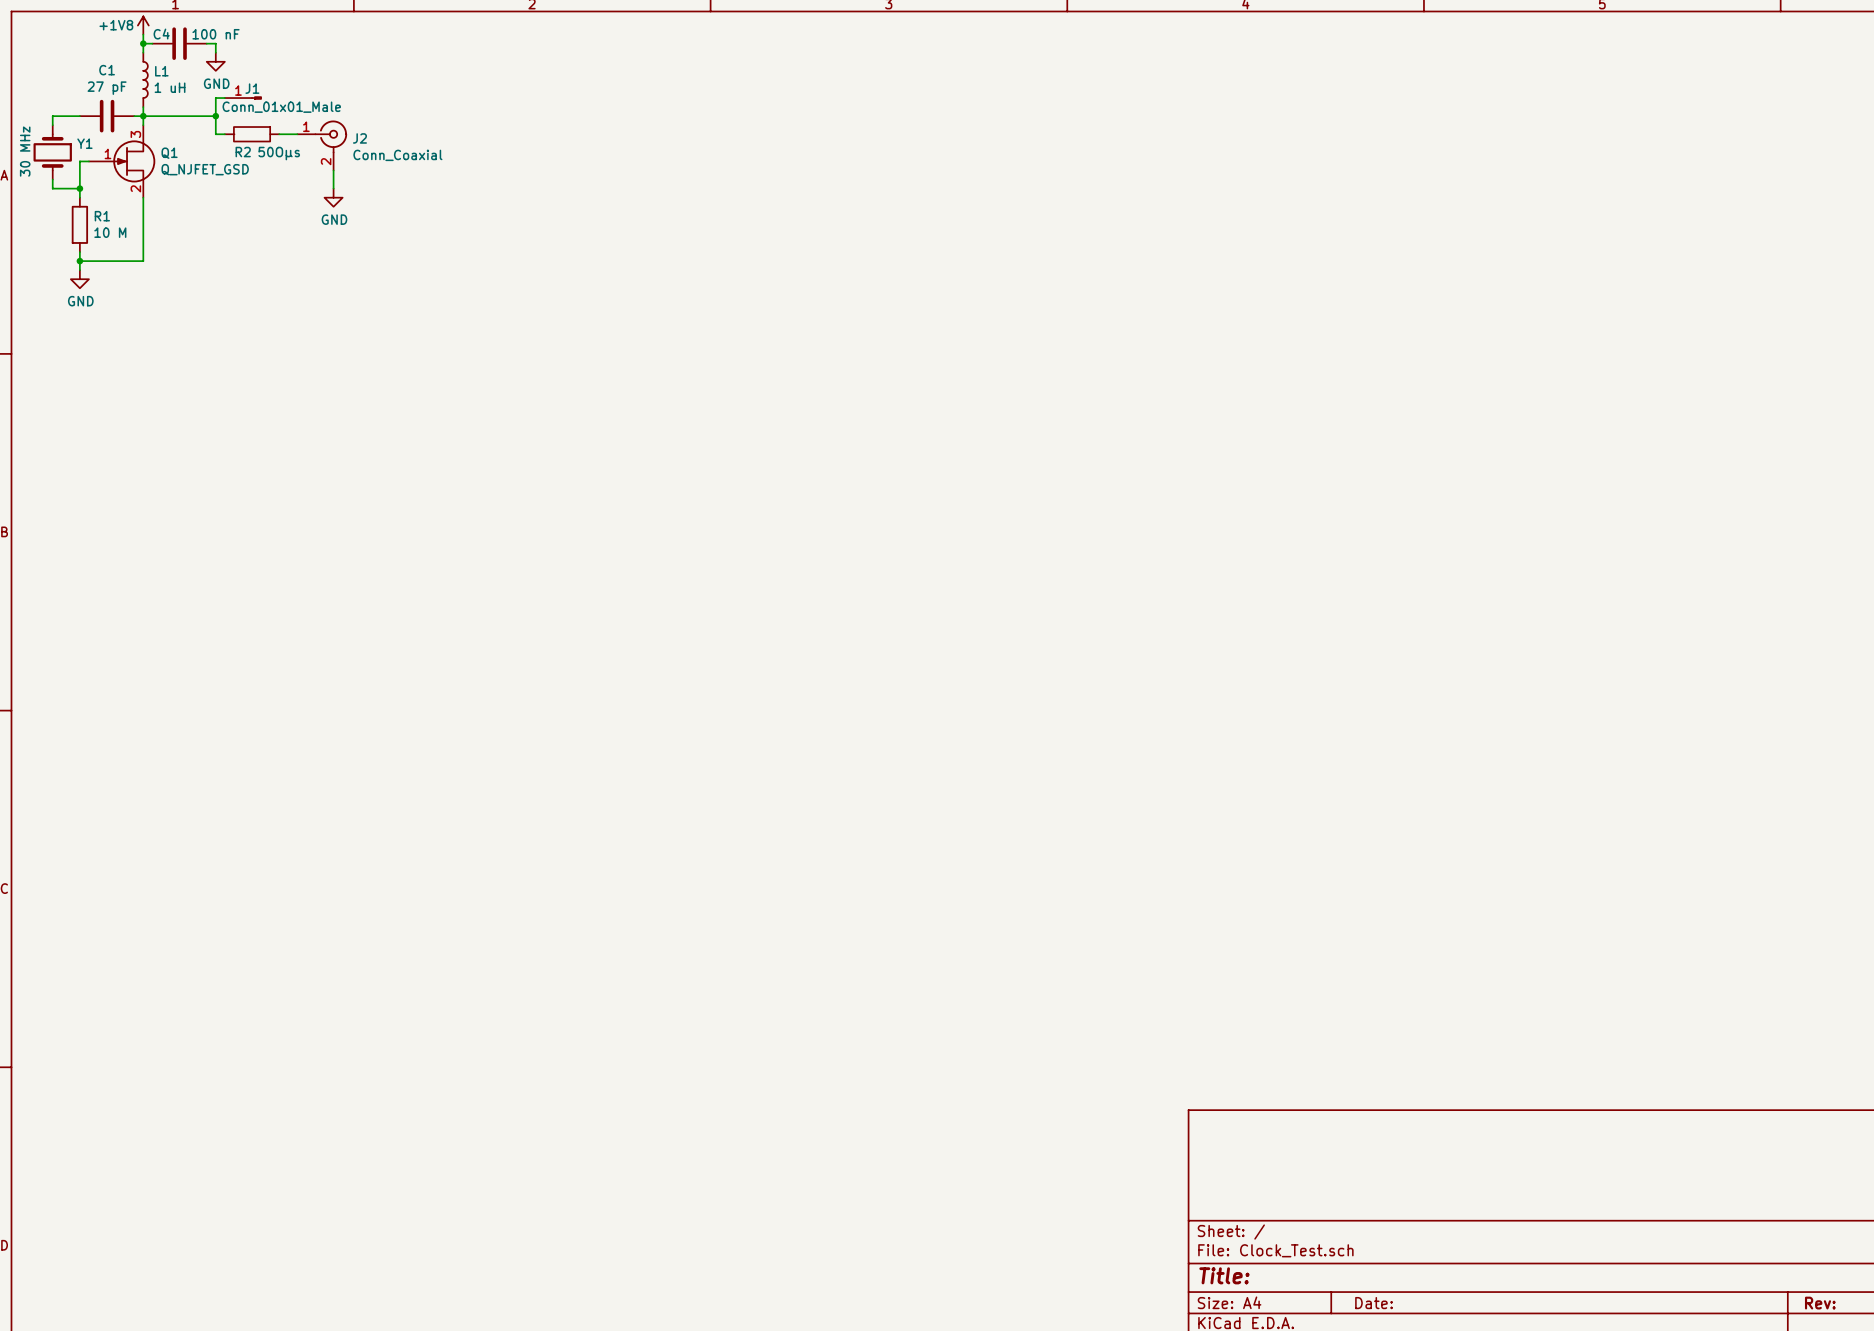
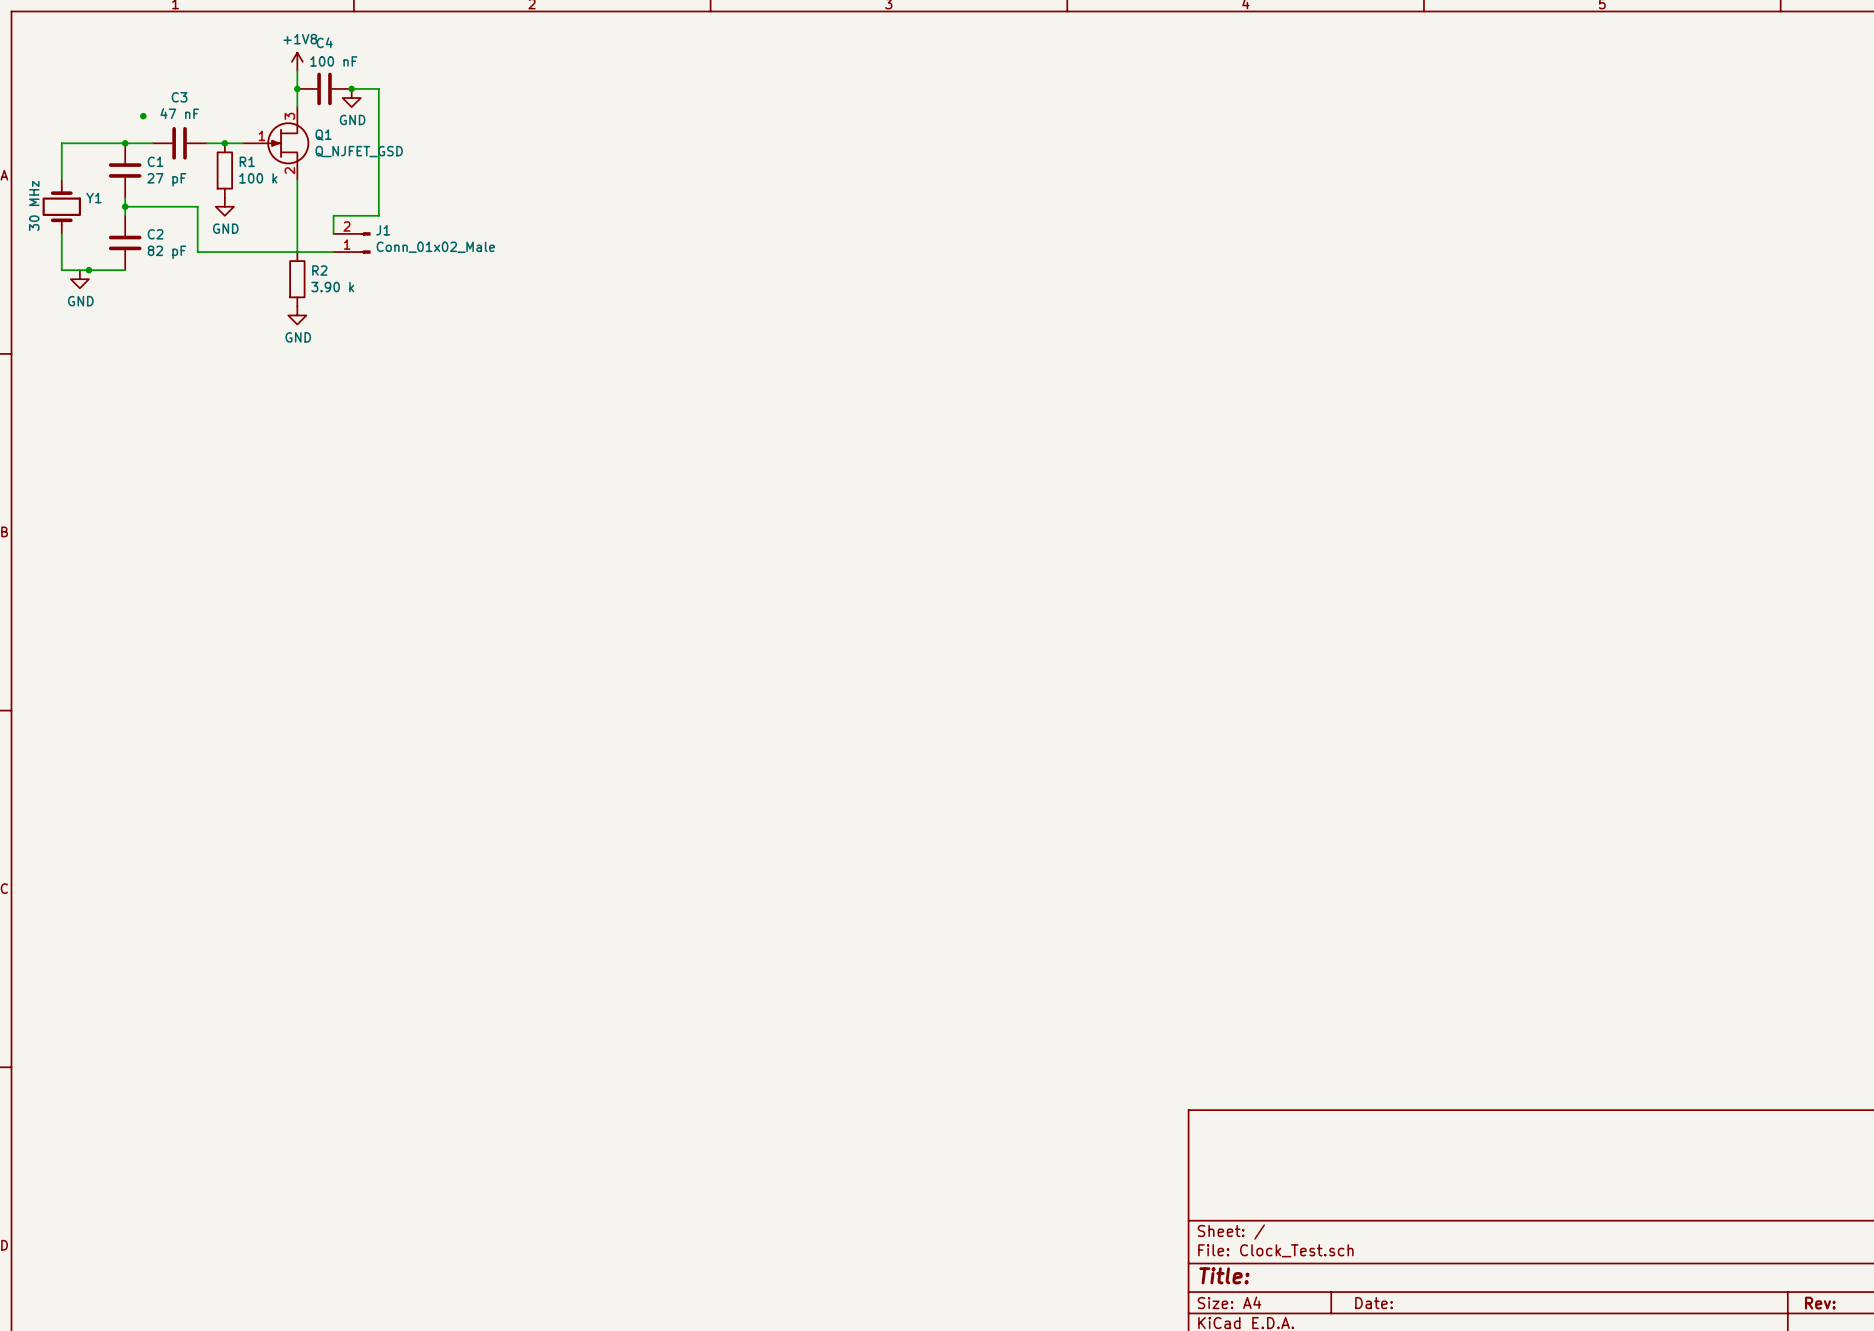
power symbol text position: +1V8 (116, 25) -> +1V8 (300, 39)
power symbol position: +1V8 (143, 25) -> +1V8 (297, 61)
wire: (143, 34) (143, 52) -> none
C4 name position: C4 (161, 34) -> C4 (324, 42)
C4 value position: 100 nF (216, 34) -> 100 nF (333, 61)
wire: (143, 43) (152, 43) -> none
junction: (143, 43) -> none
C4 position: (179, 43) -> (324, 88)
wire: (206, 43) (215, 43) (215, 52) -> none
power symbol: GND (215, 61) -> none
C1 name position: C1 (107, 70) -> C1 (155, 161)
wire: none -> (297, 70) (297, 107)
L1: 1 uH (145, 79) -> none
C1 value position: 27 pF (107, 88) -> 27 pF (166, 179)
J1 name position: J1 (252, 88) -> J1 (383, 230)
junction: none -> (297, 88)
wire: none -> (351, 88) (378, 88) (378, 215) (333, 215) (333, 233)
junction: none -> (351, 88)
J1 symbol: [224, 96, 262, 100] -> [333, 232, 371, 254]
wire: (224, 98) (215, 98) (215, 134) (224, 134) -> none
power symbol: none -> GND (351, 98)
wire: (143, 107) (143, 125) -> none
J1 value: Conn_01x01_Male (281, 107) -> Conn_01x02_Male (435, 247)
wire: (79, 116) (52, 116) (52, 125) -> none
C1 rotation: 0° (107, 116) -> 90° clockwise (125, 170)
C1 position: (107, 116) -> (125, 170)
wire: (134, 116) (215, 116) -> none
junction position: (215, 116) -> (224, 143)
R2 symbol: [224, 127, 280, 142] -> [289, 252, 306, 307]
junction: none -> (125, 143)
wire: none -> (152, 143) (61, 143) (61, 179)
C3: none -> 47 nF (179, 143)
wire: none -> (206, 143) (242, 143)
J2: Conn_Coaxial (322, 145) -> none
Y1 position: (52, 152) -> (61, 206)
R2 name position: R2 (243, 152) -> R2 (319, 270)
R2 value: 50Oμs (279, 153) -> 3.90 k (332, 287)
wire: (88, 161) (79, 161) (79, 197) -> none
Q1 position: (122, 161) -> (276, 143)
wire: (333, 170) (333, 188) -> none
wire: (52, 179) (52, 188) (79, 188) -> none
wire: none -> (297, 179) (297, 252)
junction: (79, 188) -> none
wire: (143, 197) (143, 261) (79, 261) -> none
power symbol: GND (333, 197) -> none
wire: none -> (125, 206) (197, 206) (197, 252) (333, 252)
junction: none -> (125, 206)
power symbol: none -> GND (224, 206)
R1 position: (79, 224) -> (224, 170)
R1 value: 10 M (110, 232) -> 100 k (258, 178)
wire: none -> (61, 233) (61, 270) (125, 270)
C2: none -> 82 pF (125, 242)
wire: (79, 252) (79, 270) -> (125, 197) (125, 215)
junction position: (79, 261) -> (88, 270)
power symbol: none -> GND (297, 315)

